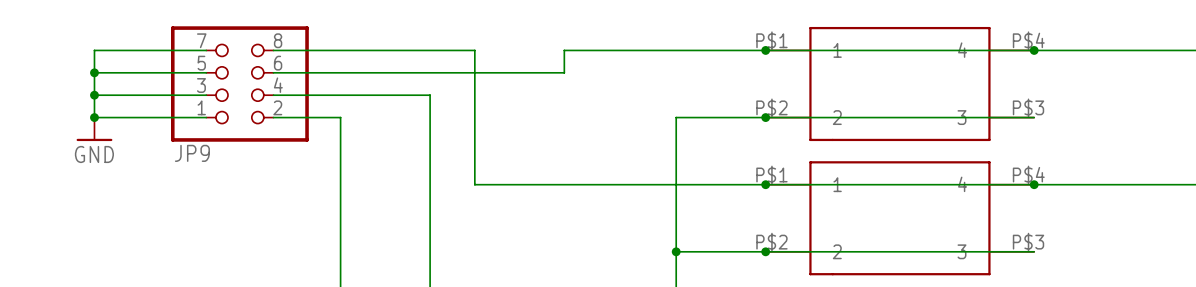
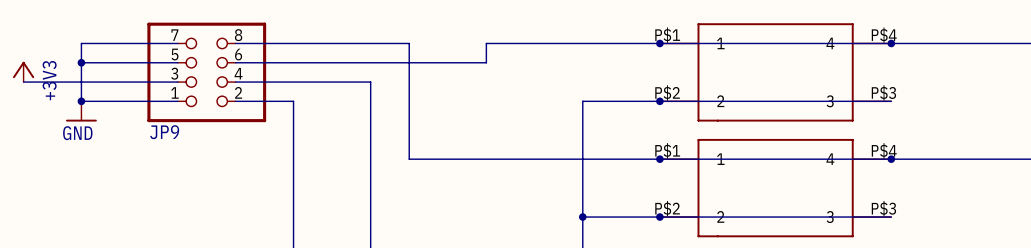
power symbol: none -> +3V3 (23, 71)
wire: none -> (23, 82) (81, 82)
junction: (94, 95) -> none

